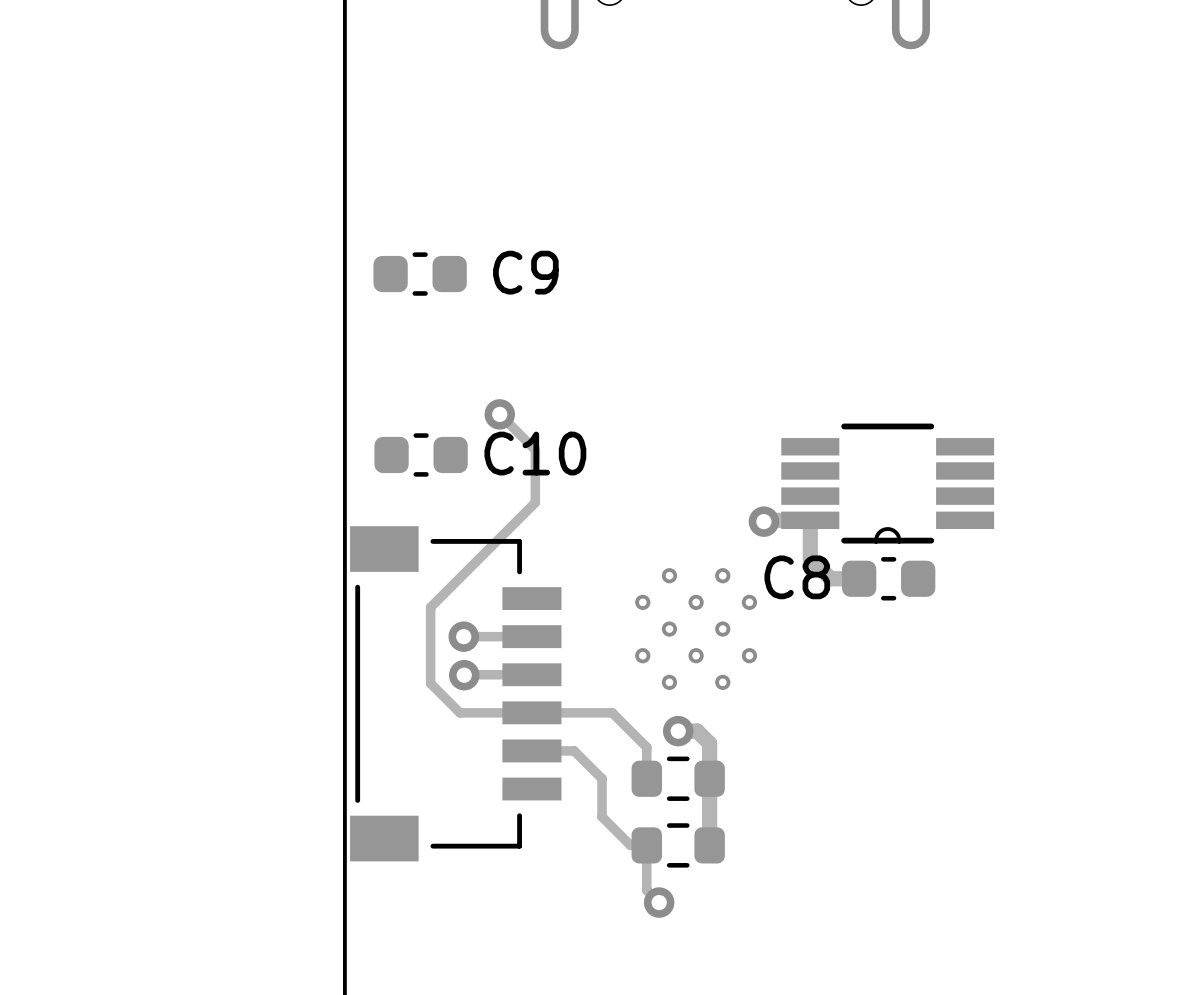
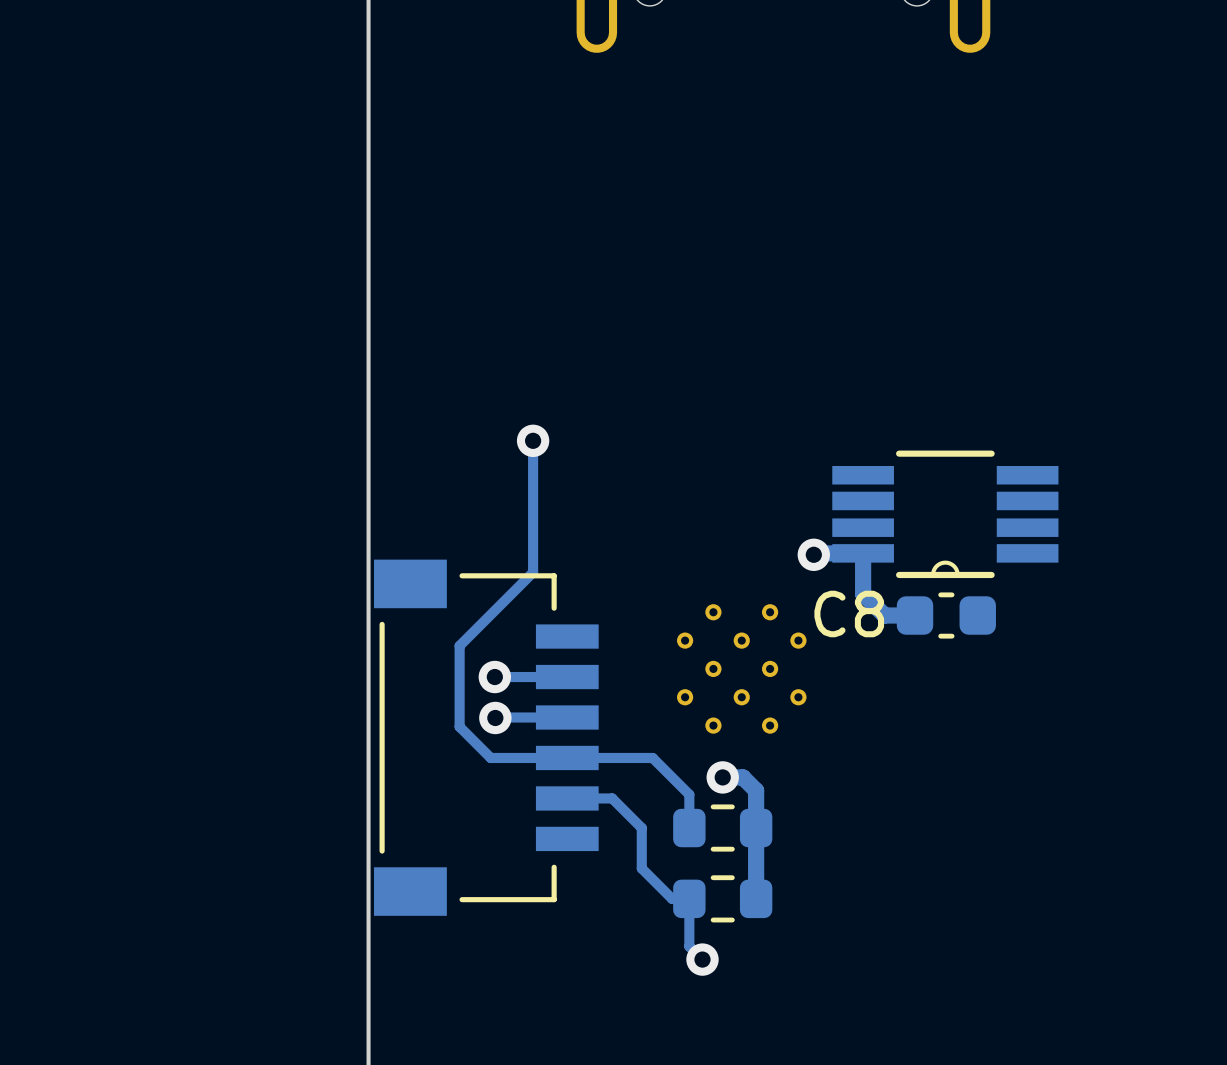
C9: (420, 274) -> none
track: (499, 414) (535, 450) (535, 502) (499, 538) -> (533, 440) (533, 572)
C10: (421, 454) -> none

